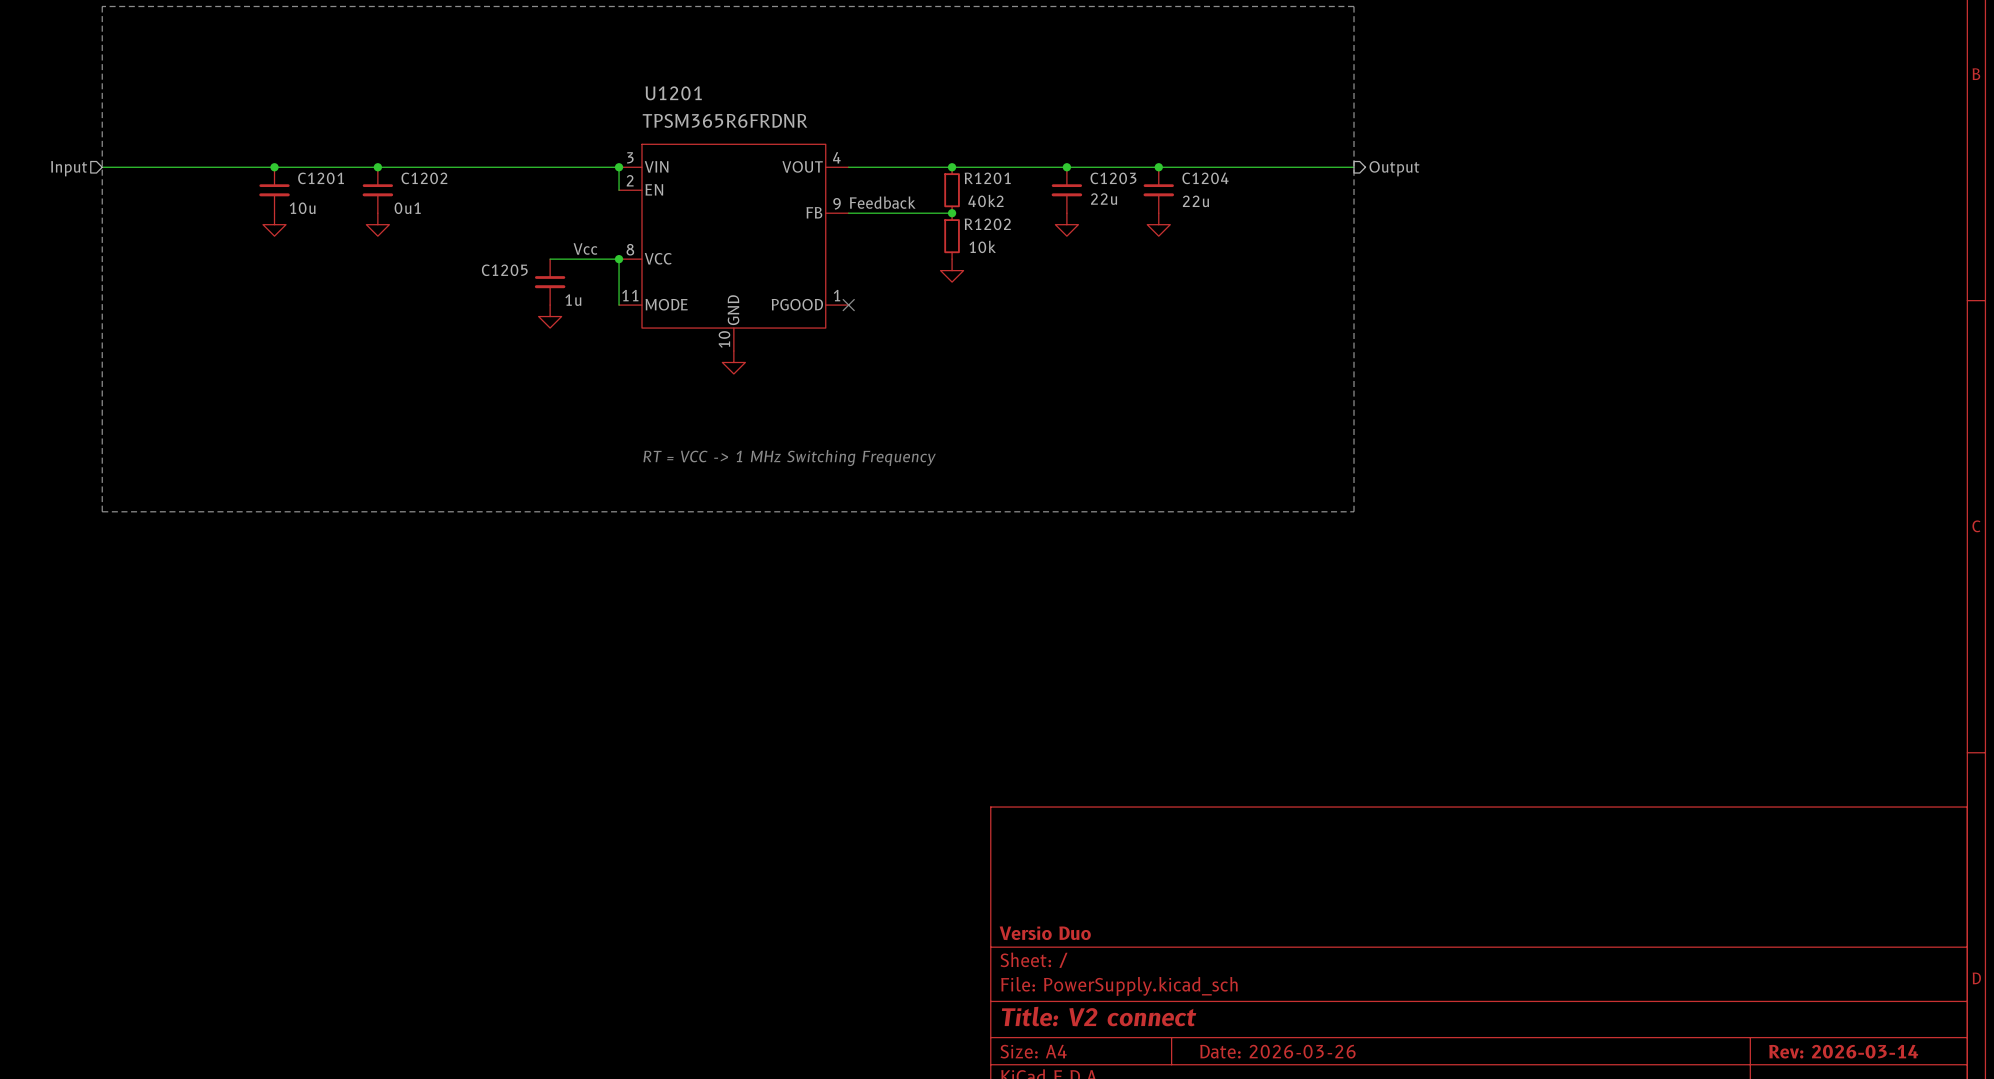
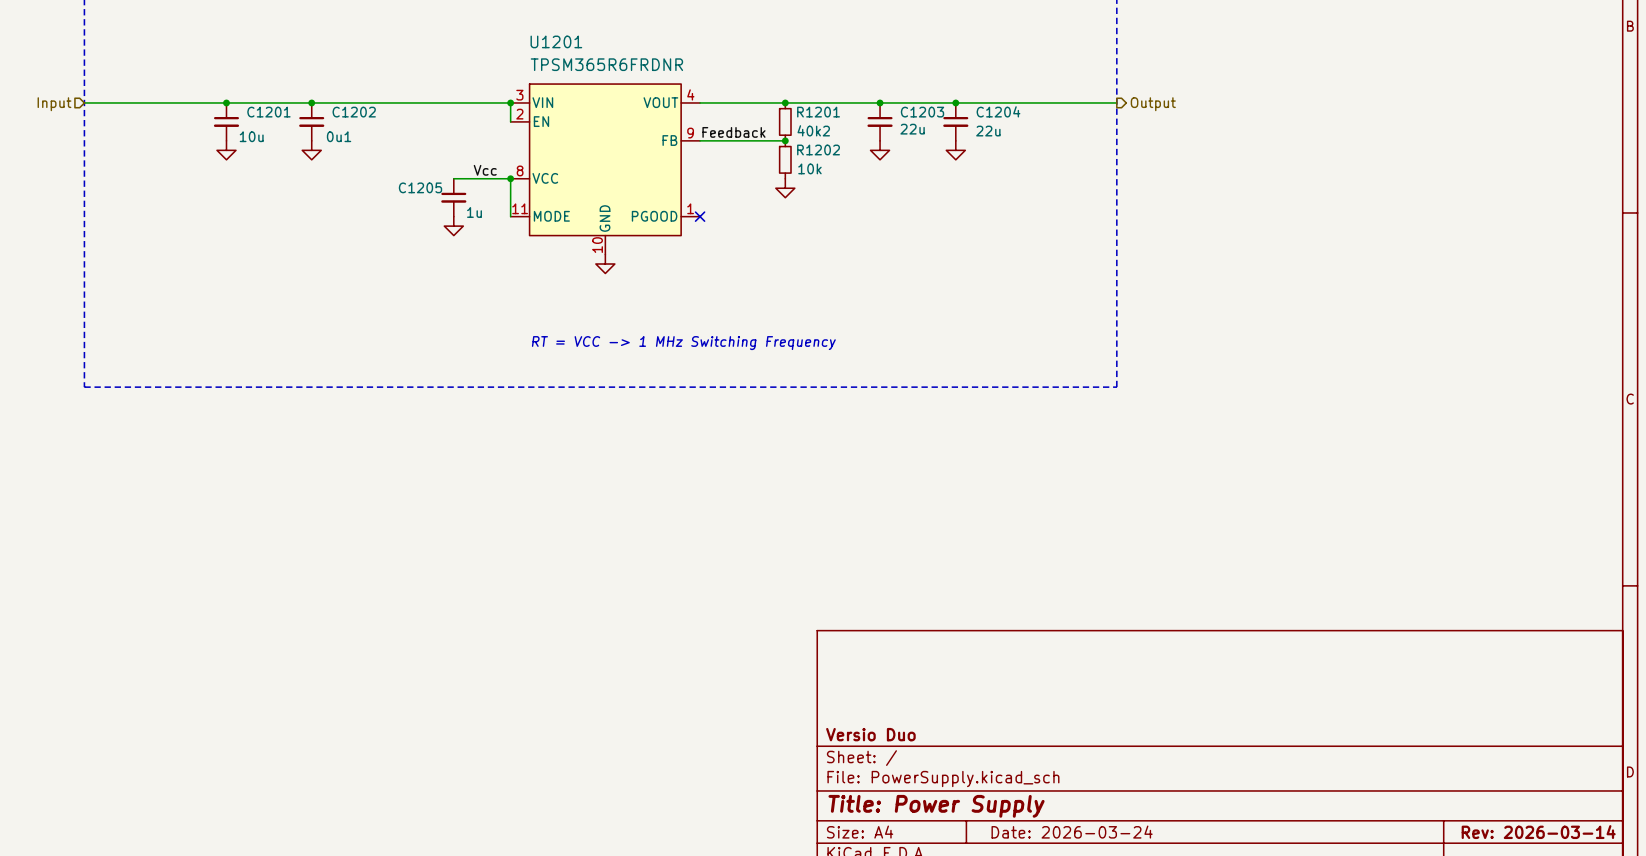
title block: Title: V2 connect (1099, 1016) -> Title: Power Supply (936, 806)
title block: Date: 2026-03-26 (1277, 1051) -> Date: 2026-03-24 (1072, 832)

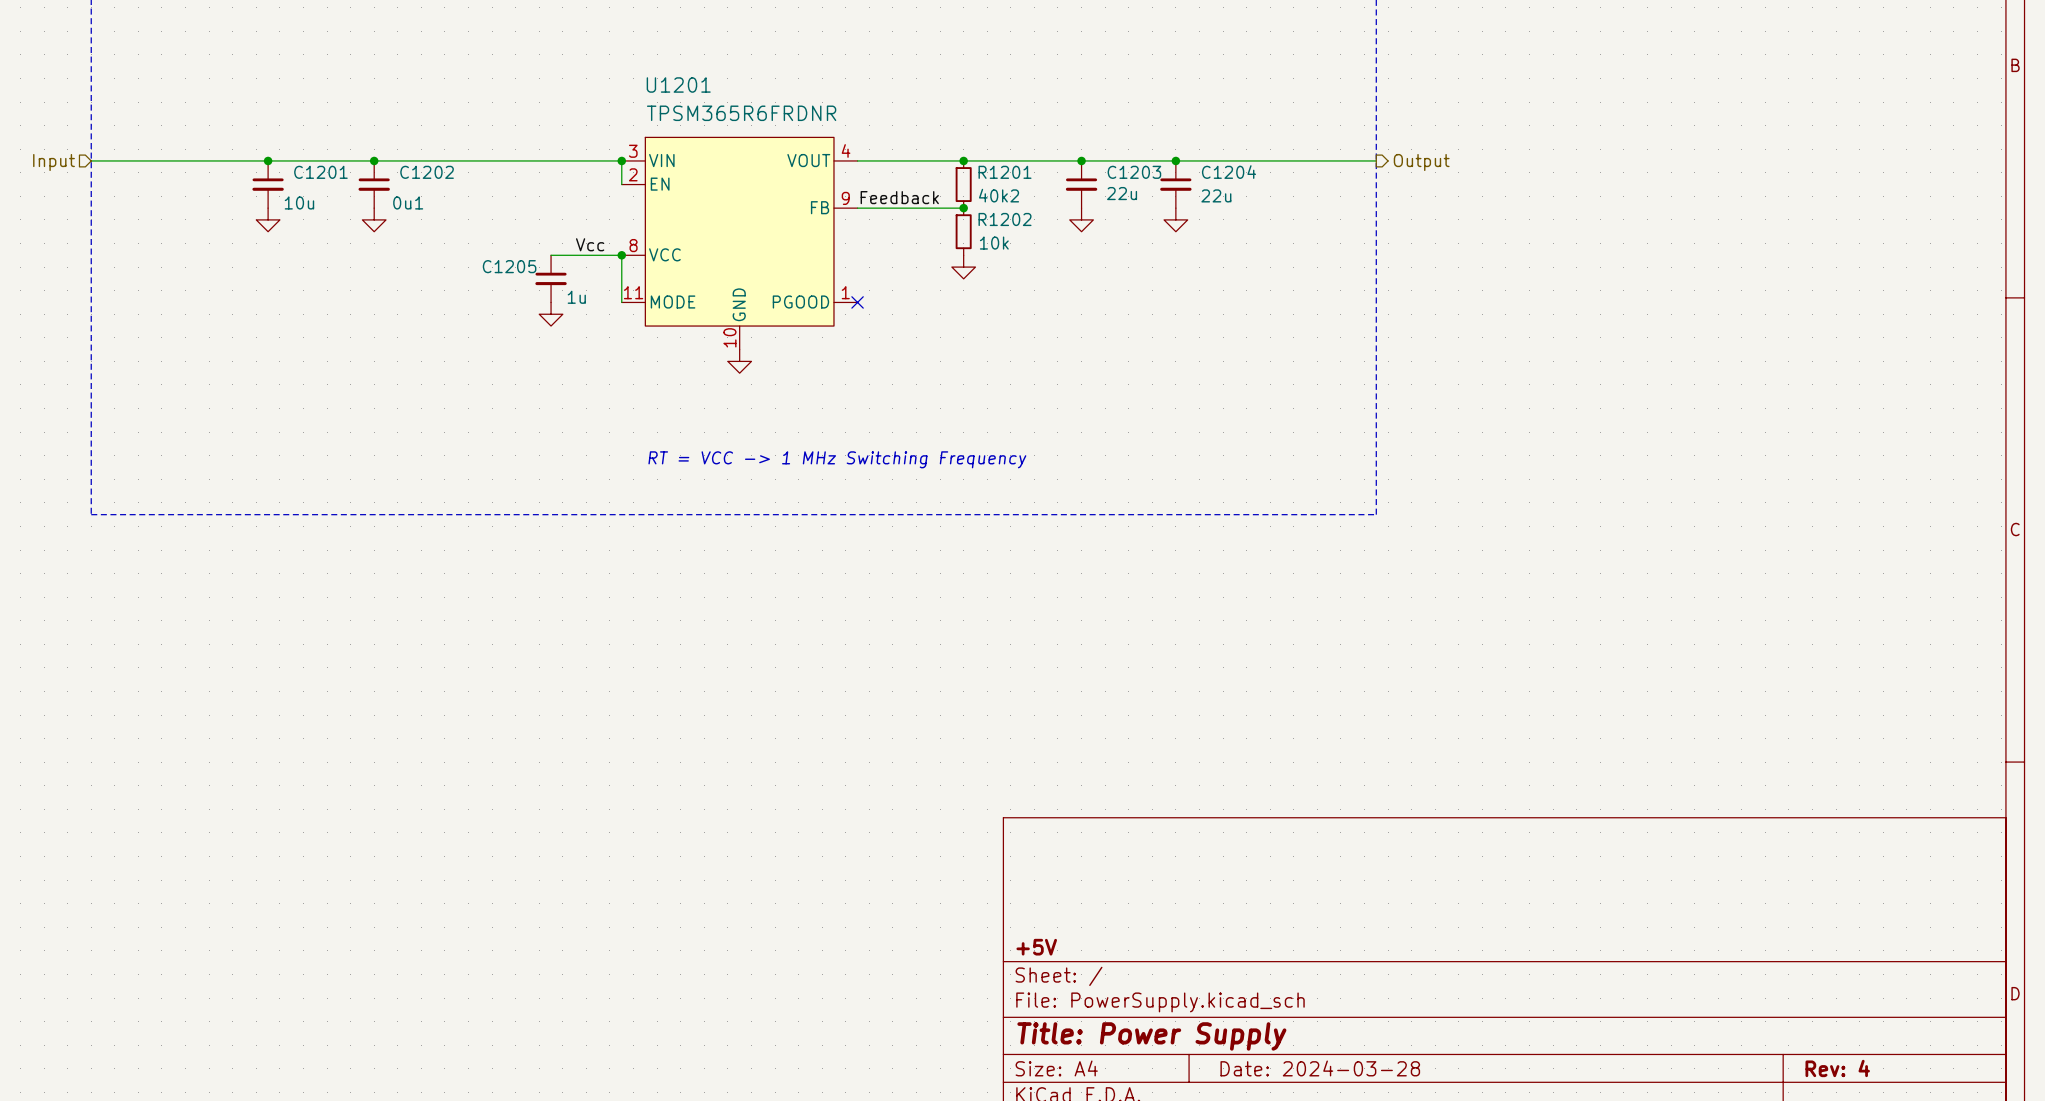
title block: Versio Duo (870, 734) -> +5V (1036, 947)
title block: Date: 2026-03-24 (1072, 832) -> Date: 2024-03-28 (1320, 1068)
title block: Rev: 2026-03-14 (1538, 832) -> Rev: 4 (1837, 1068)

